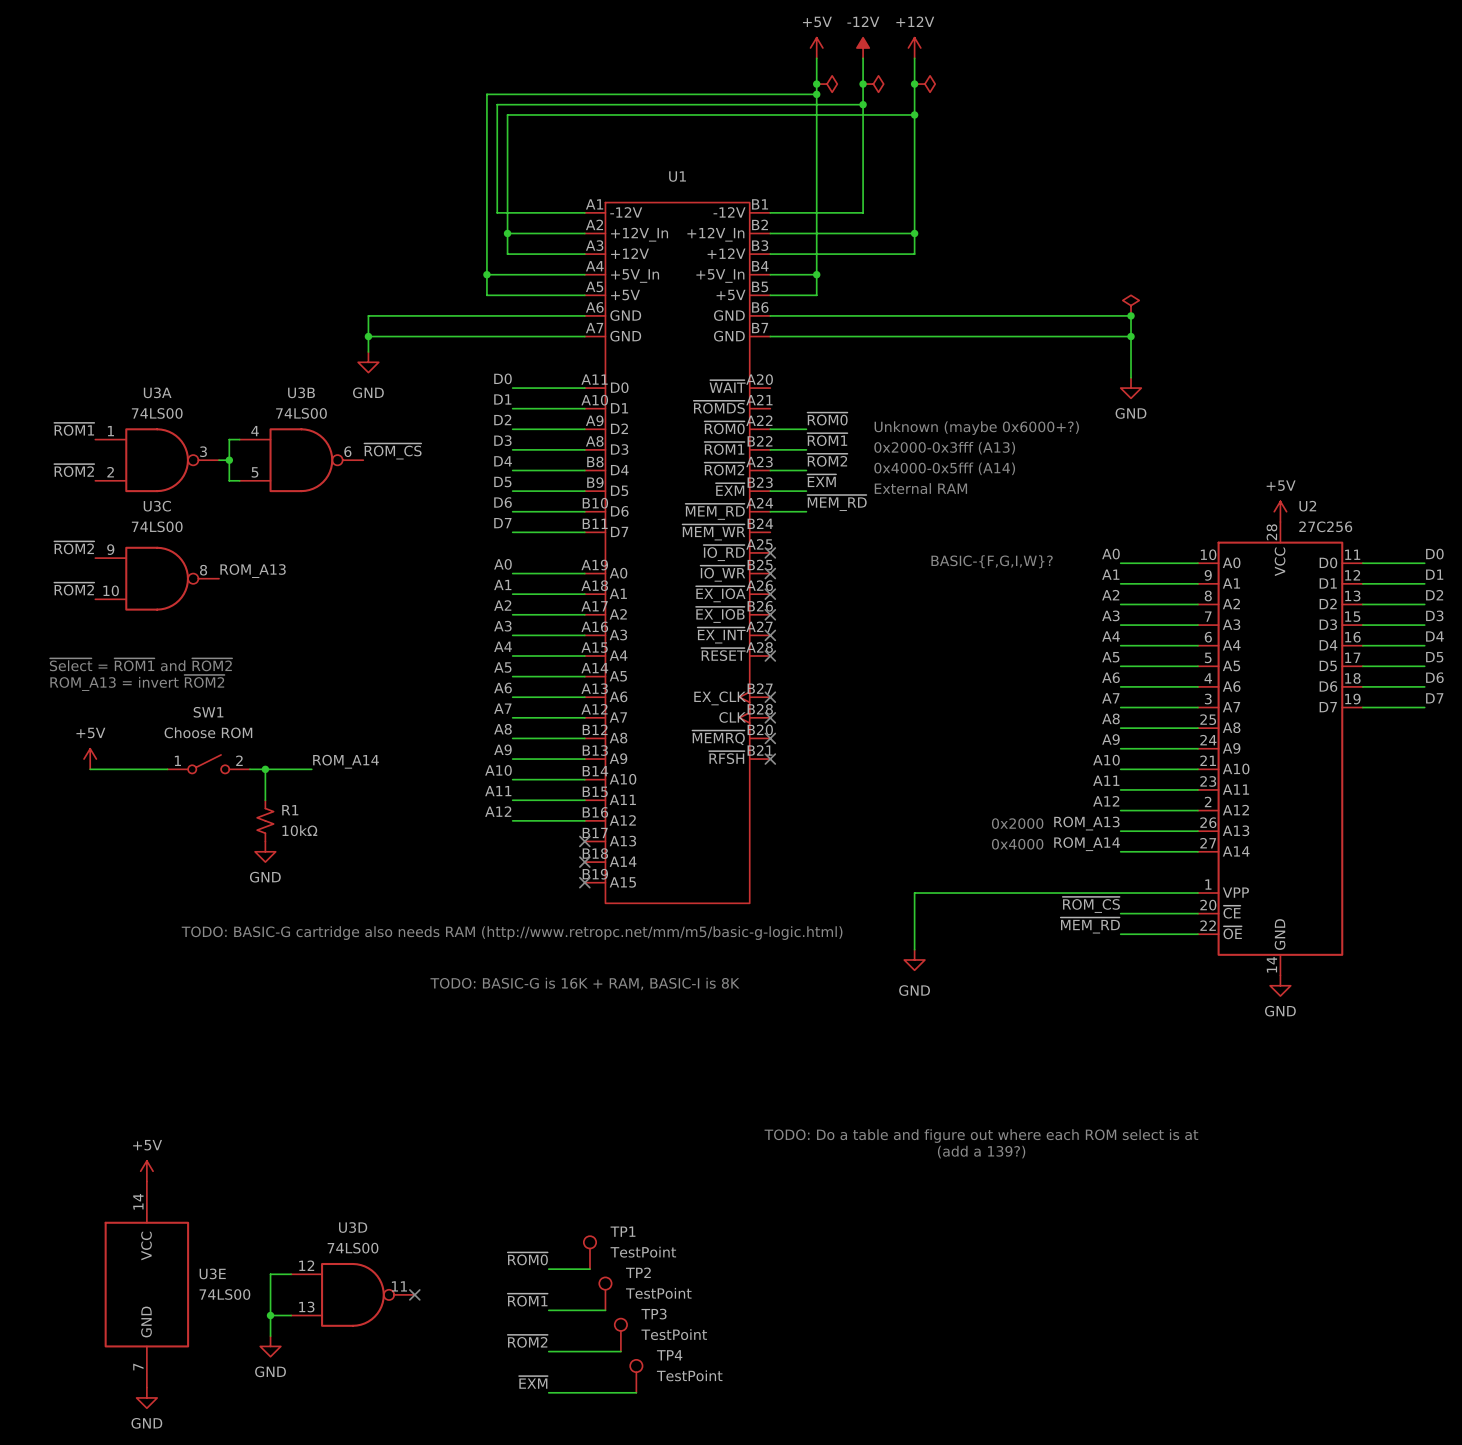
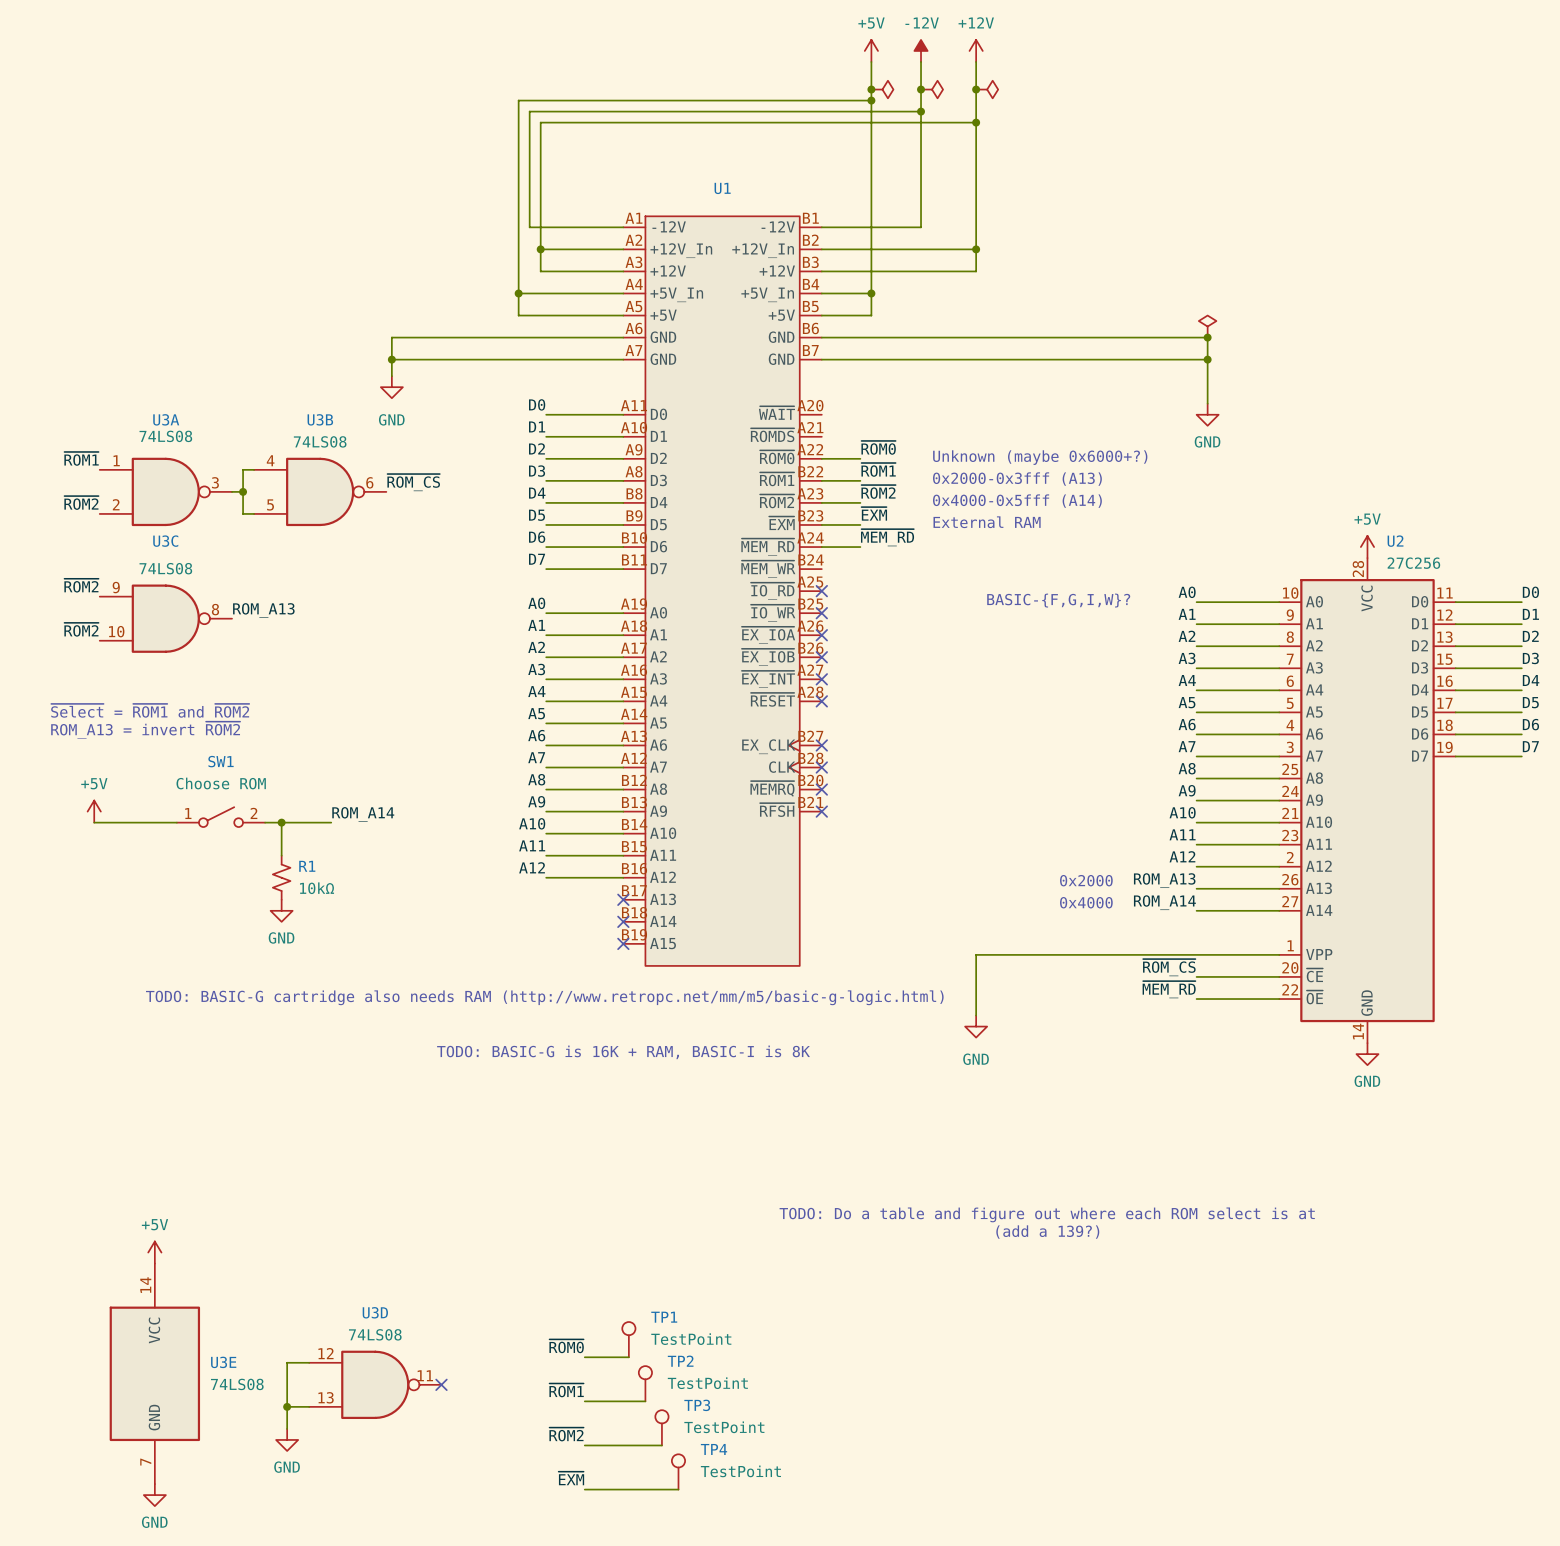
U3A value: 74LS00 (157, 413) -> 74LS08 (165, 436)
U3B value: 74LS00 (301, 413) -> 74LS08 (320, 441)
U3C value: 74LS00 (157, 526) -> 74LS08 (165, 568)
U3D value: 74LS00 (353, 1248) -> 74LS08 (375, 1334)
U3E value: 74LS00 (224, 1294) -> 74LS08 (237, 1384)

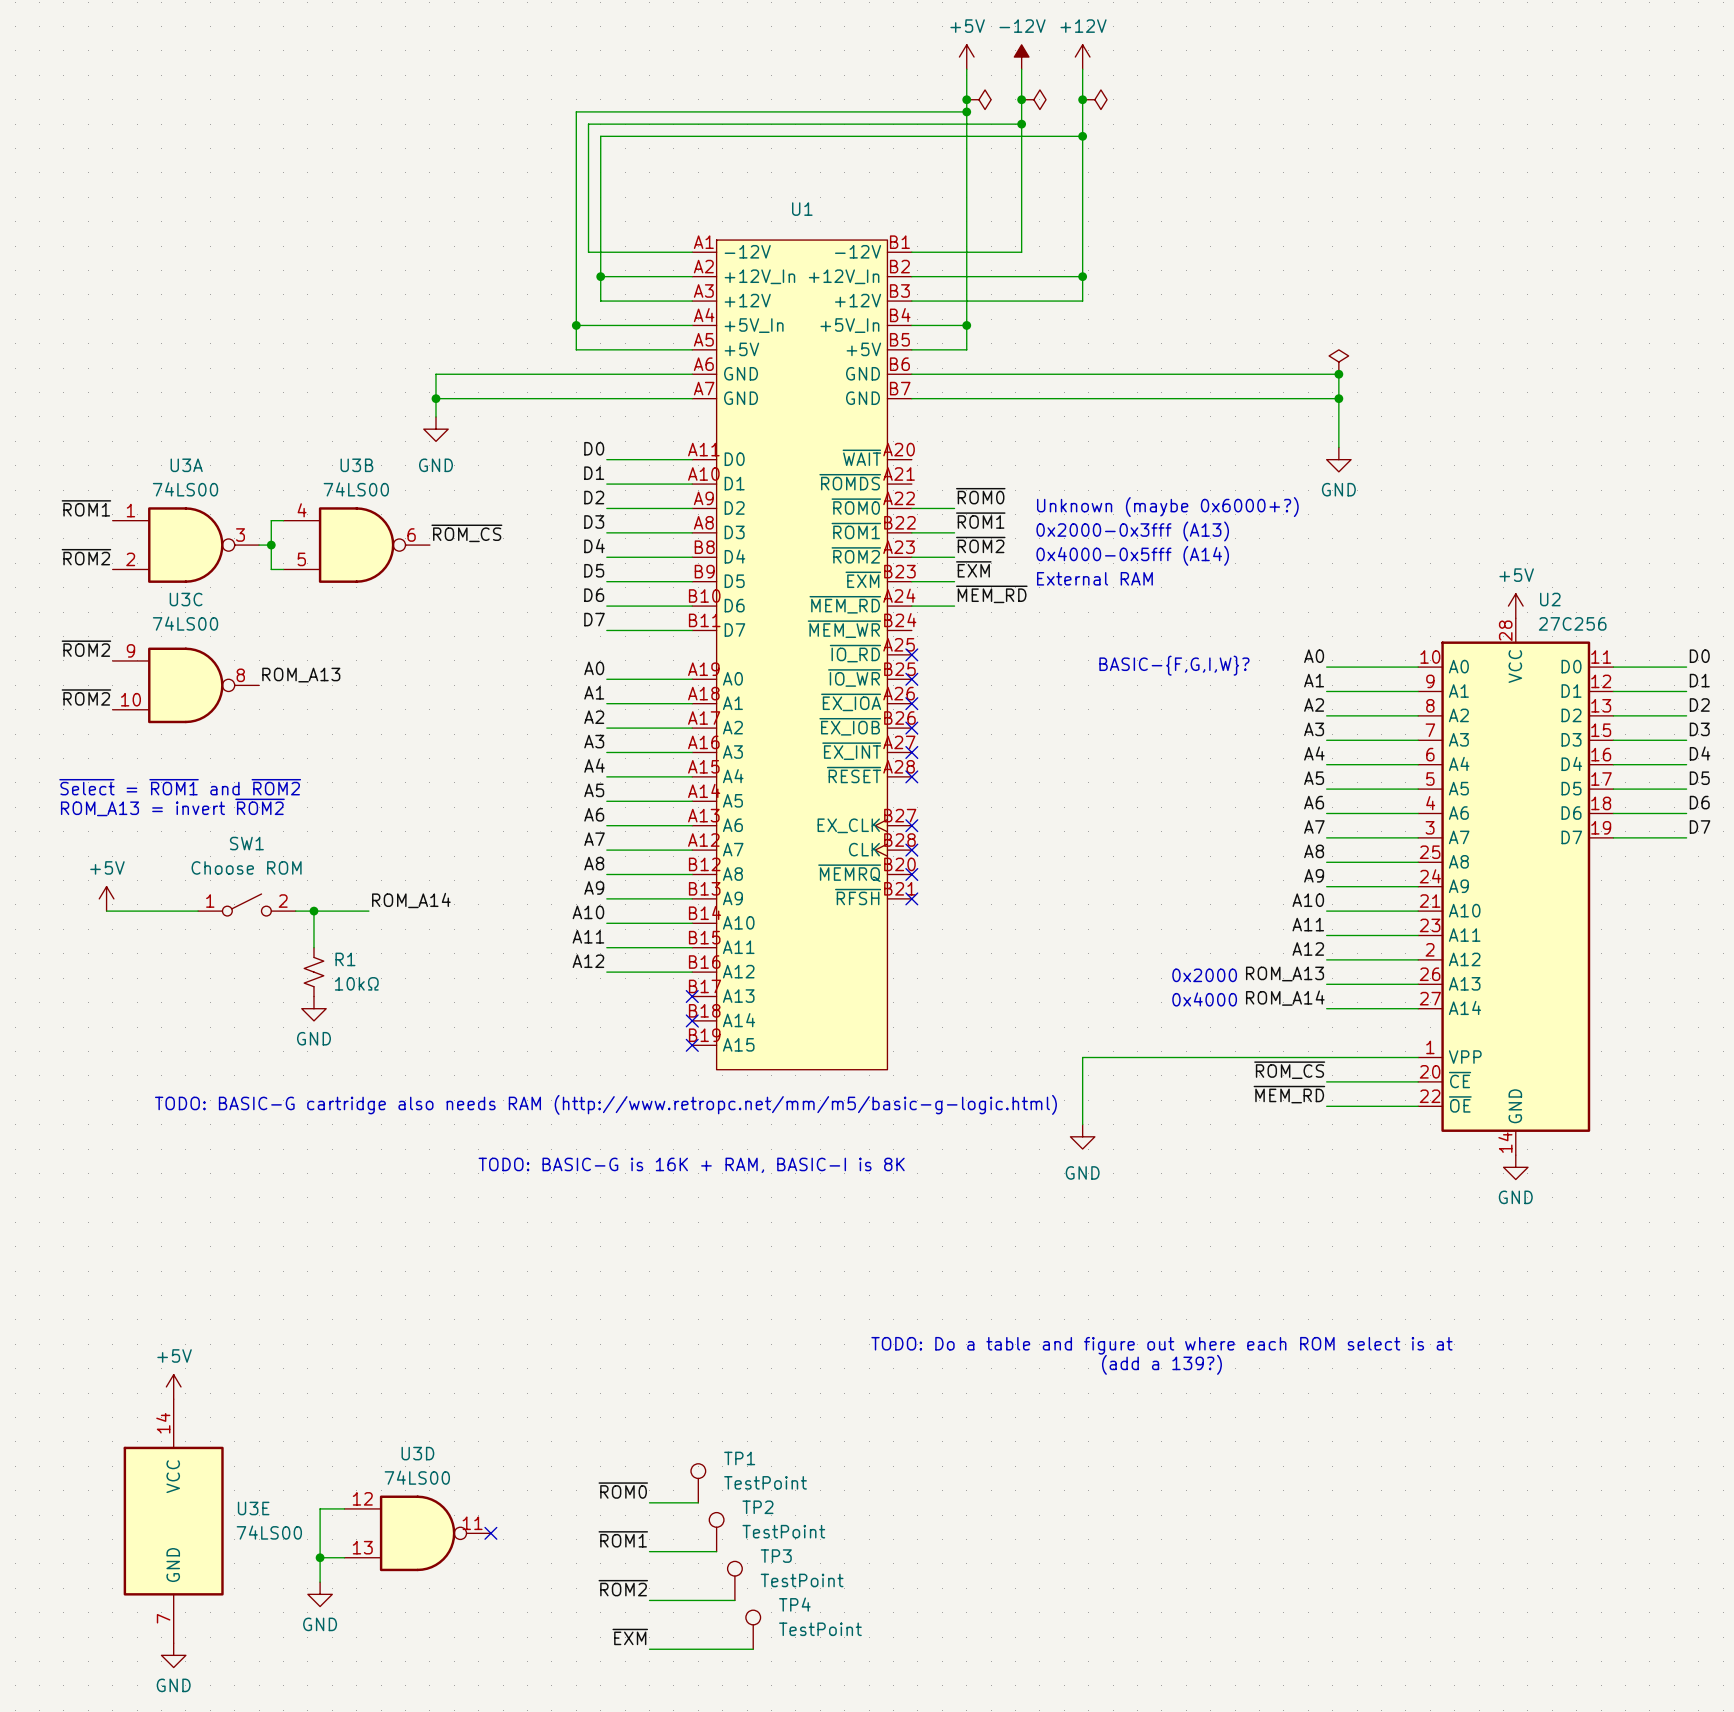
U3A value: 74LS08 (165, 436) -> 74LS00 (185, 489)
U3B value: 74LS08 (320, 441) -> 74LS00 (356, 489)
U3C value: 74LS08 (165, 568) -> 74LS00 (185, 623)
U3D value: 74LS08 (375, 1334) -> 74LS00 (417, 1477)
U3E value: 74LS08 (237, 1384) -> 74LS00 (269, 1532)

